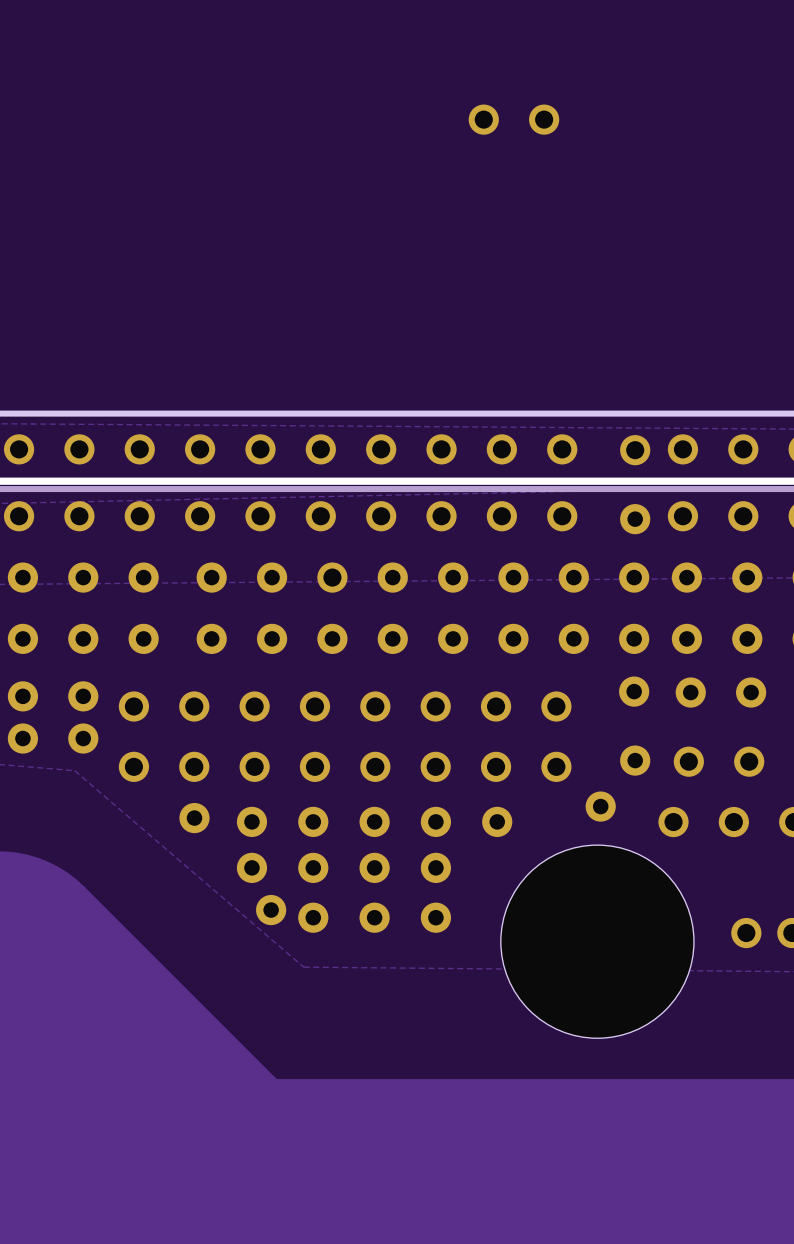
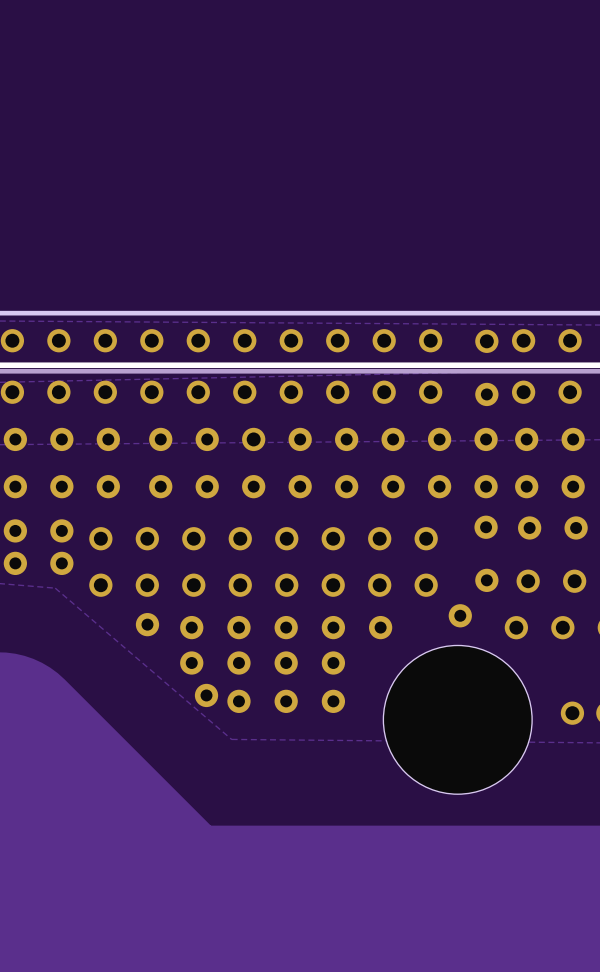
via: (483, 119) -> none
via: (544, 119) -> none

